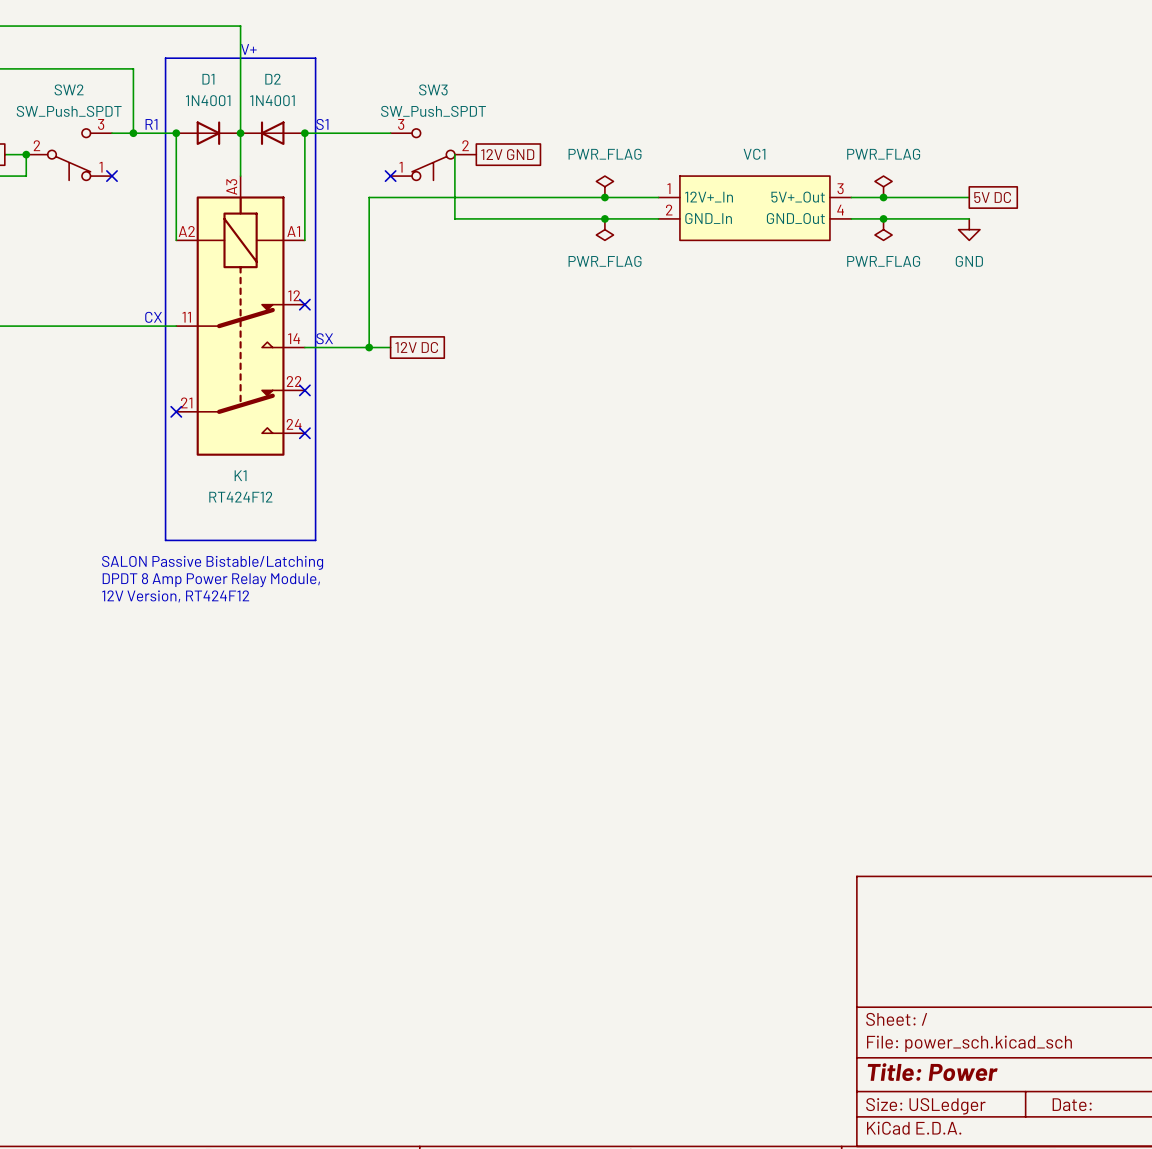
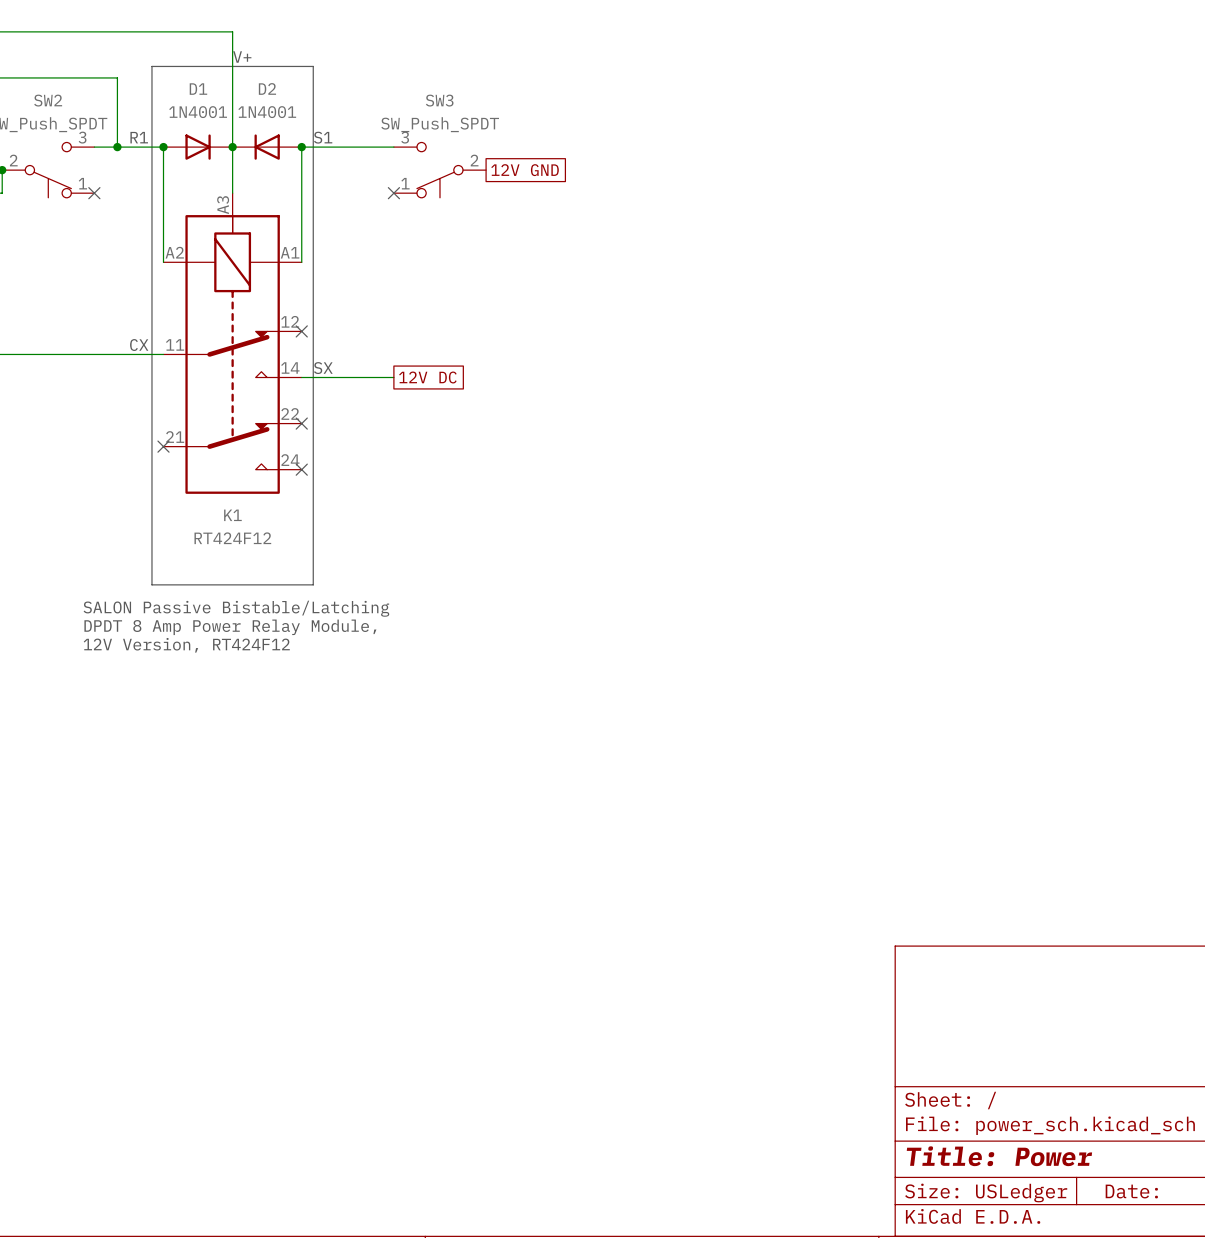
wire: (454, 154) (454, 218) (658, 218) -> none
power symbol: PWR_FLAG (604, 186) -> none
power symbol: PWR_FLAG (883, 186) -> none
junction: (604, 197) -> none
wire: (658, 197) (369, 197) (369, 347) -> none
wire: (851, 197) (969, 197) -> none
junction: (883, 197) -> none
global label: 5V DC (992, 197) -> none
VC1: (754, 208) -> none
junction: (604, 218) -> none
wire: (851, 218) (969, 218) -> none
junction: (883, 218) -> none
power symbol: PWR_FLAG (604, 229) -> none
power symbol: PWR_FLAG (883, 229) -> none
power symbol: GND (969, 229) -> none
junction: (369, 347) -> none

